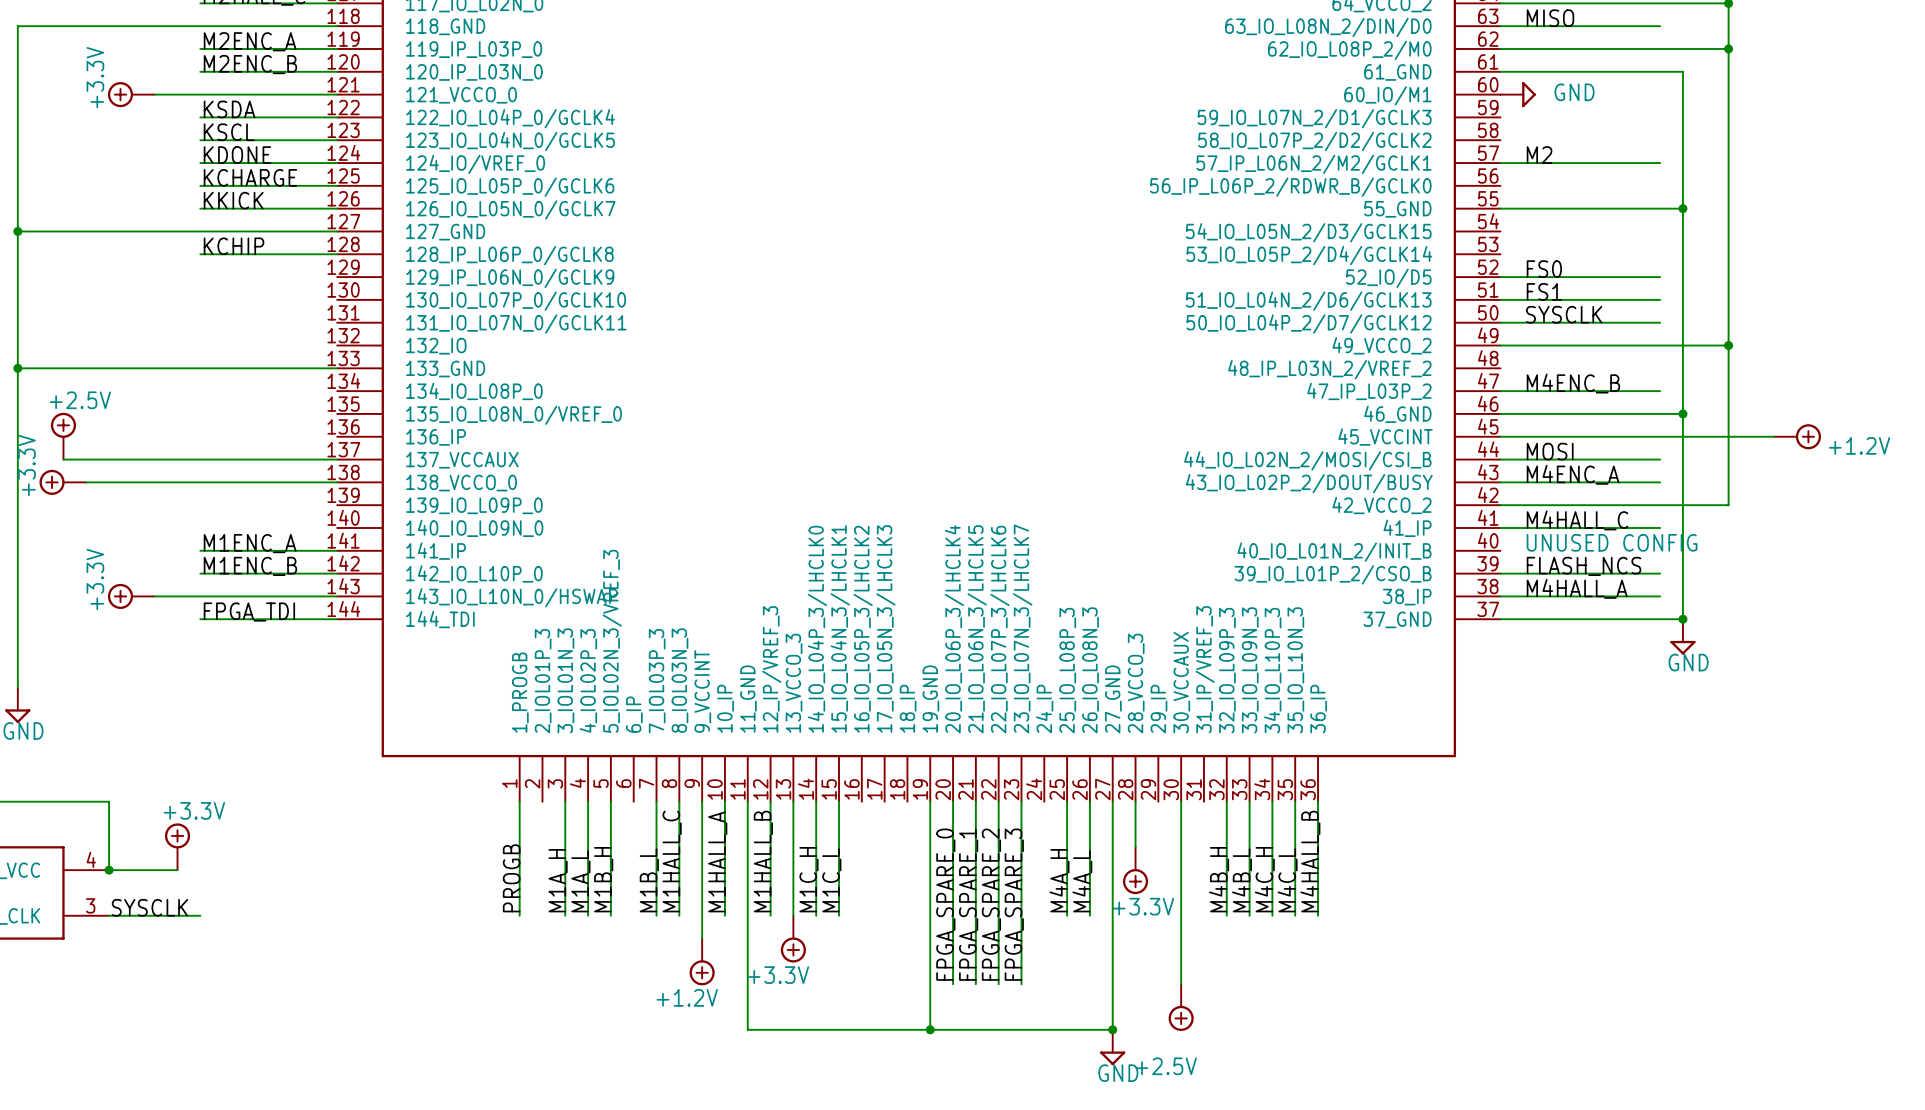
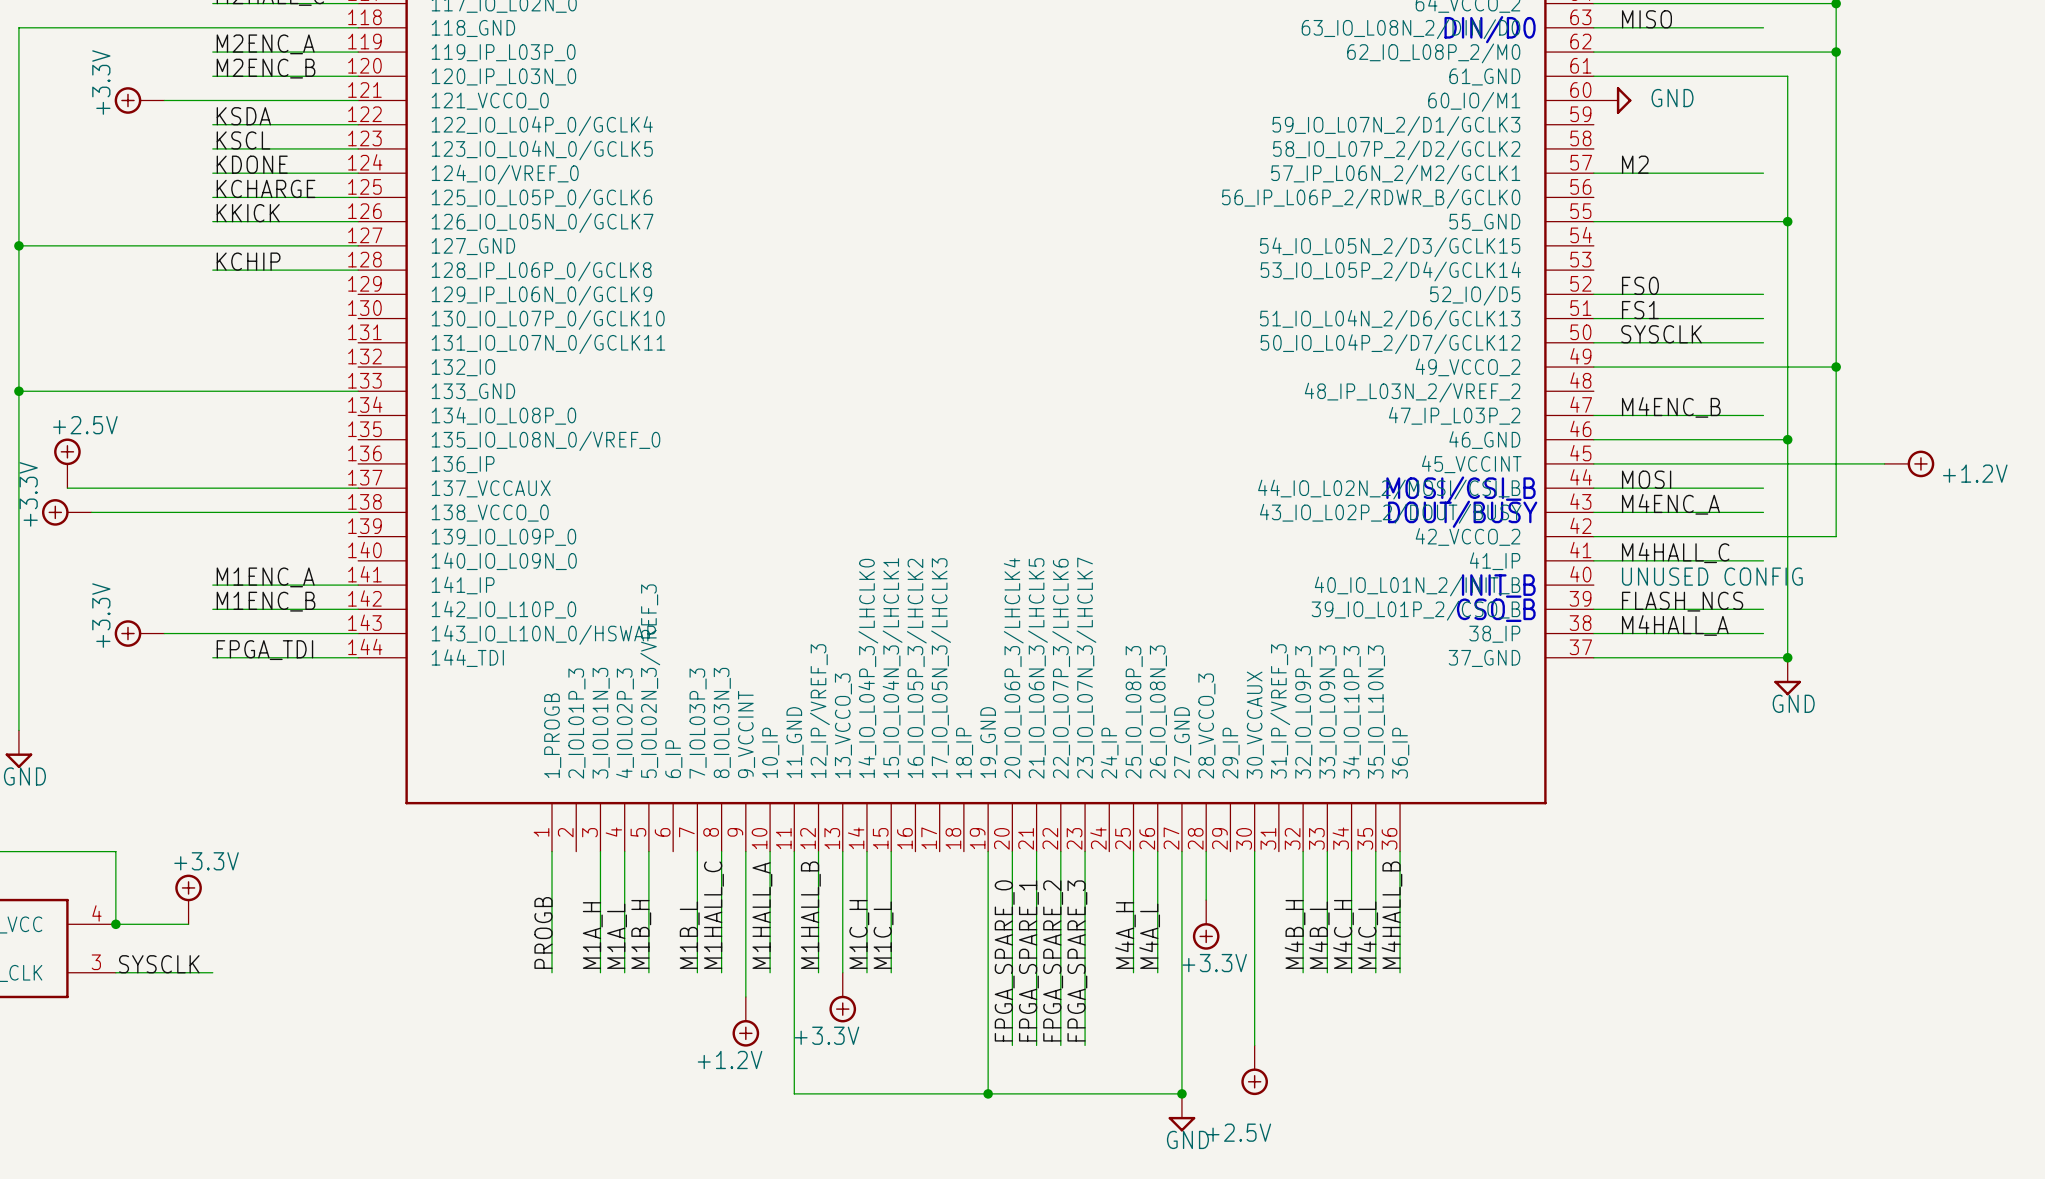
text: none -> DIN/D0 (1490, 29)
text: none -> MOSI/CSI_B (1460, 490)
text: none -> DOUT/BUSY (1462, 514)
text: none -> INIT_B (1498, 586)
text: none -> CSO_B (1496, 610)

